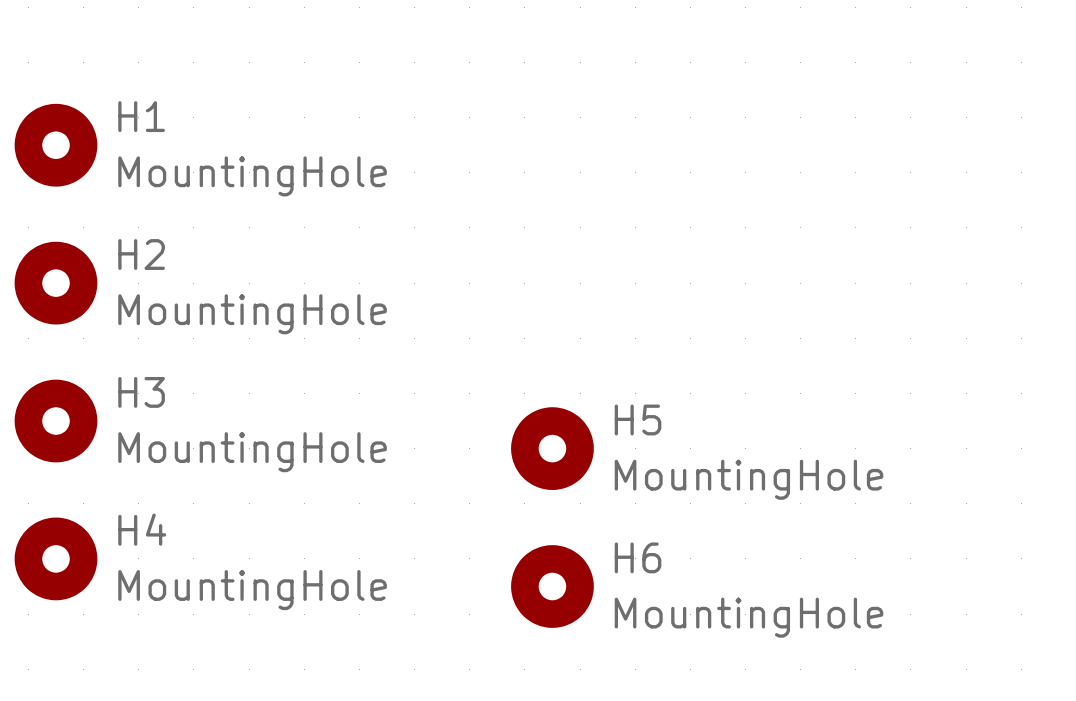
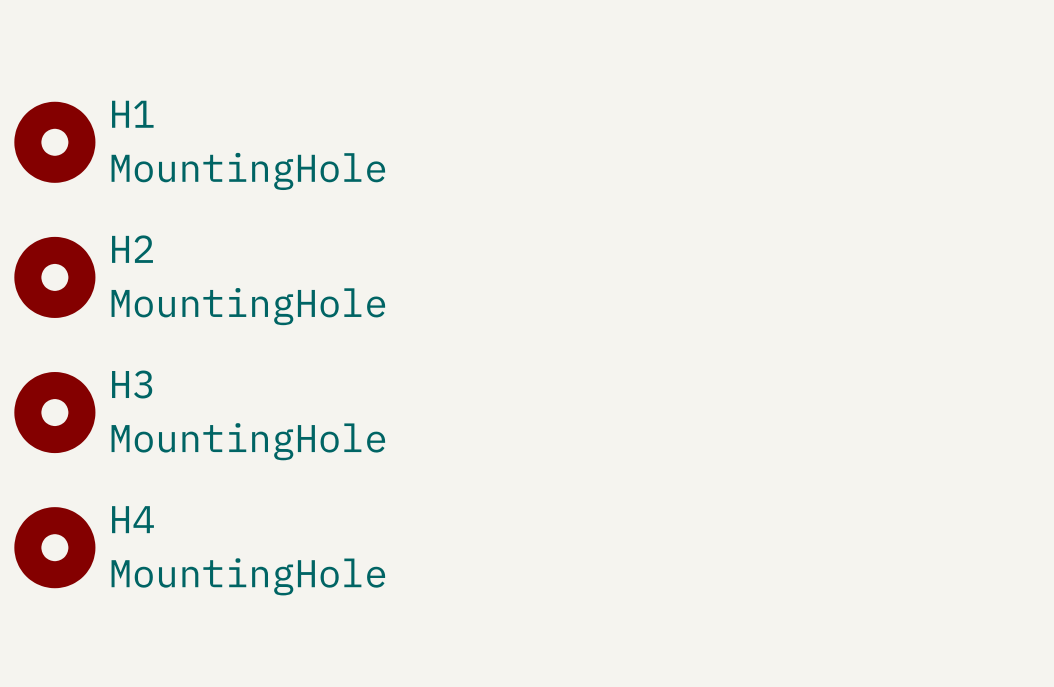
H5: MountingHole (552, 448) -> none
H6: MountingHole (552, 586) -> none

